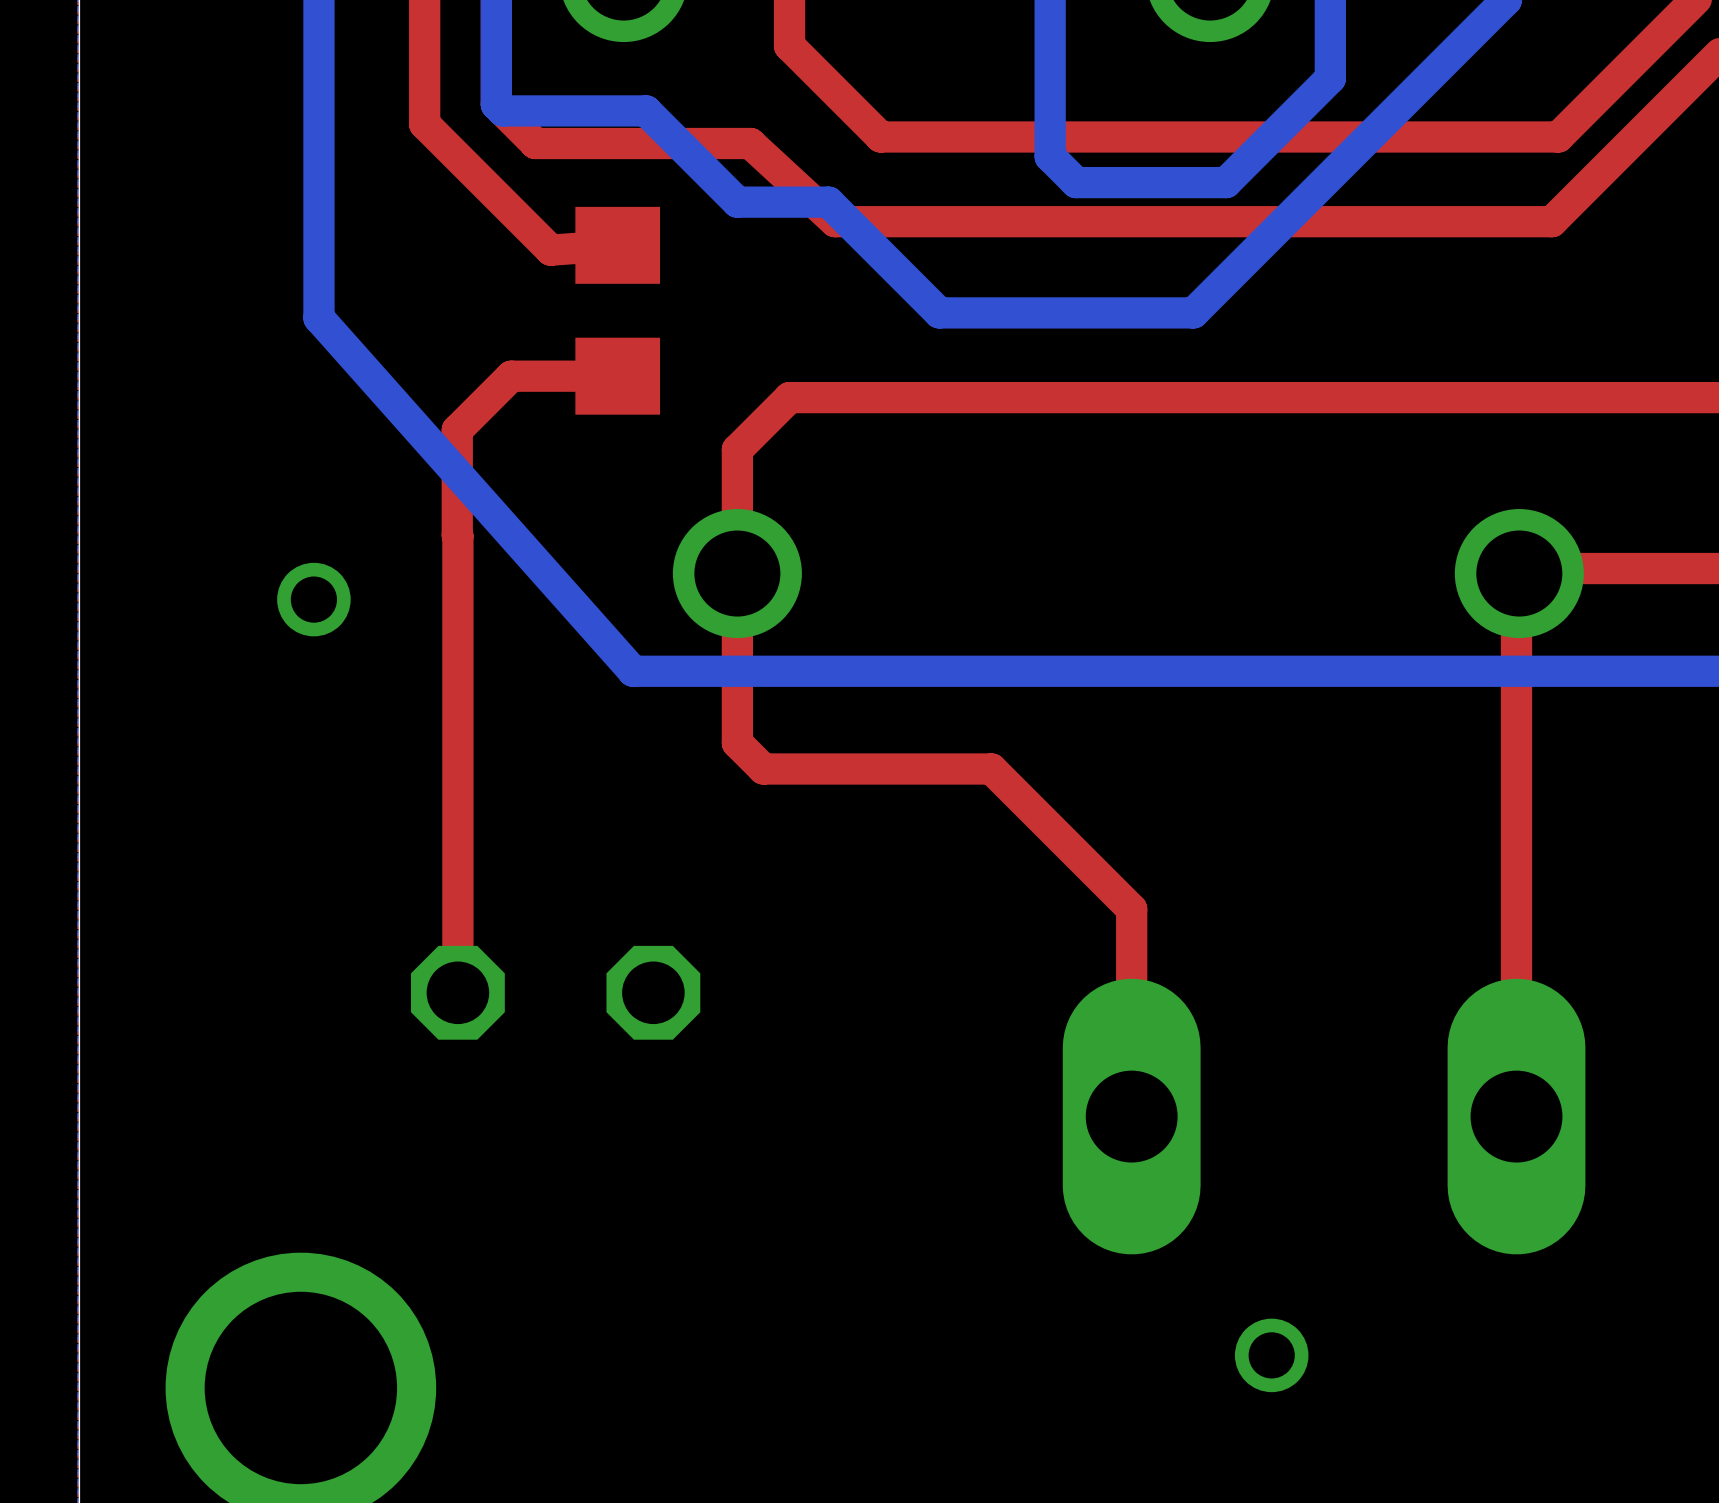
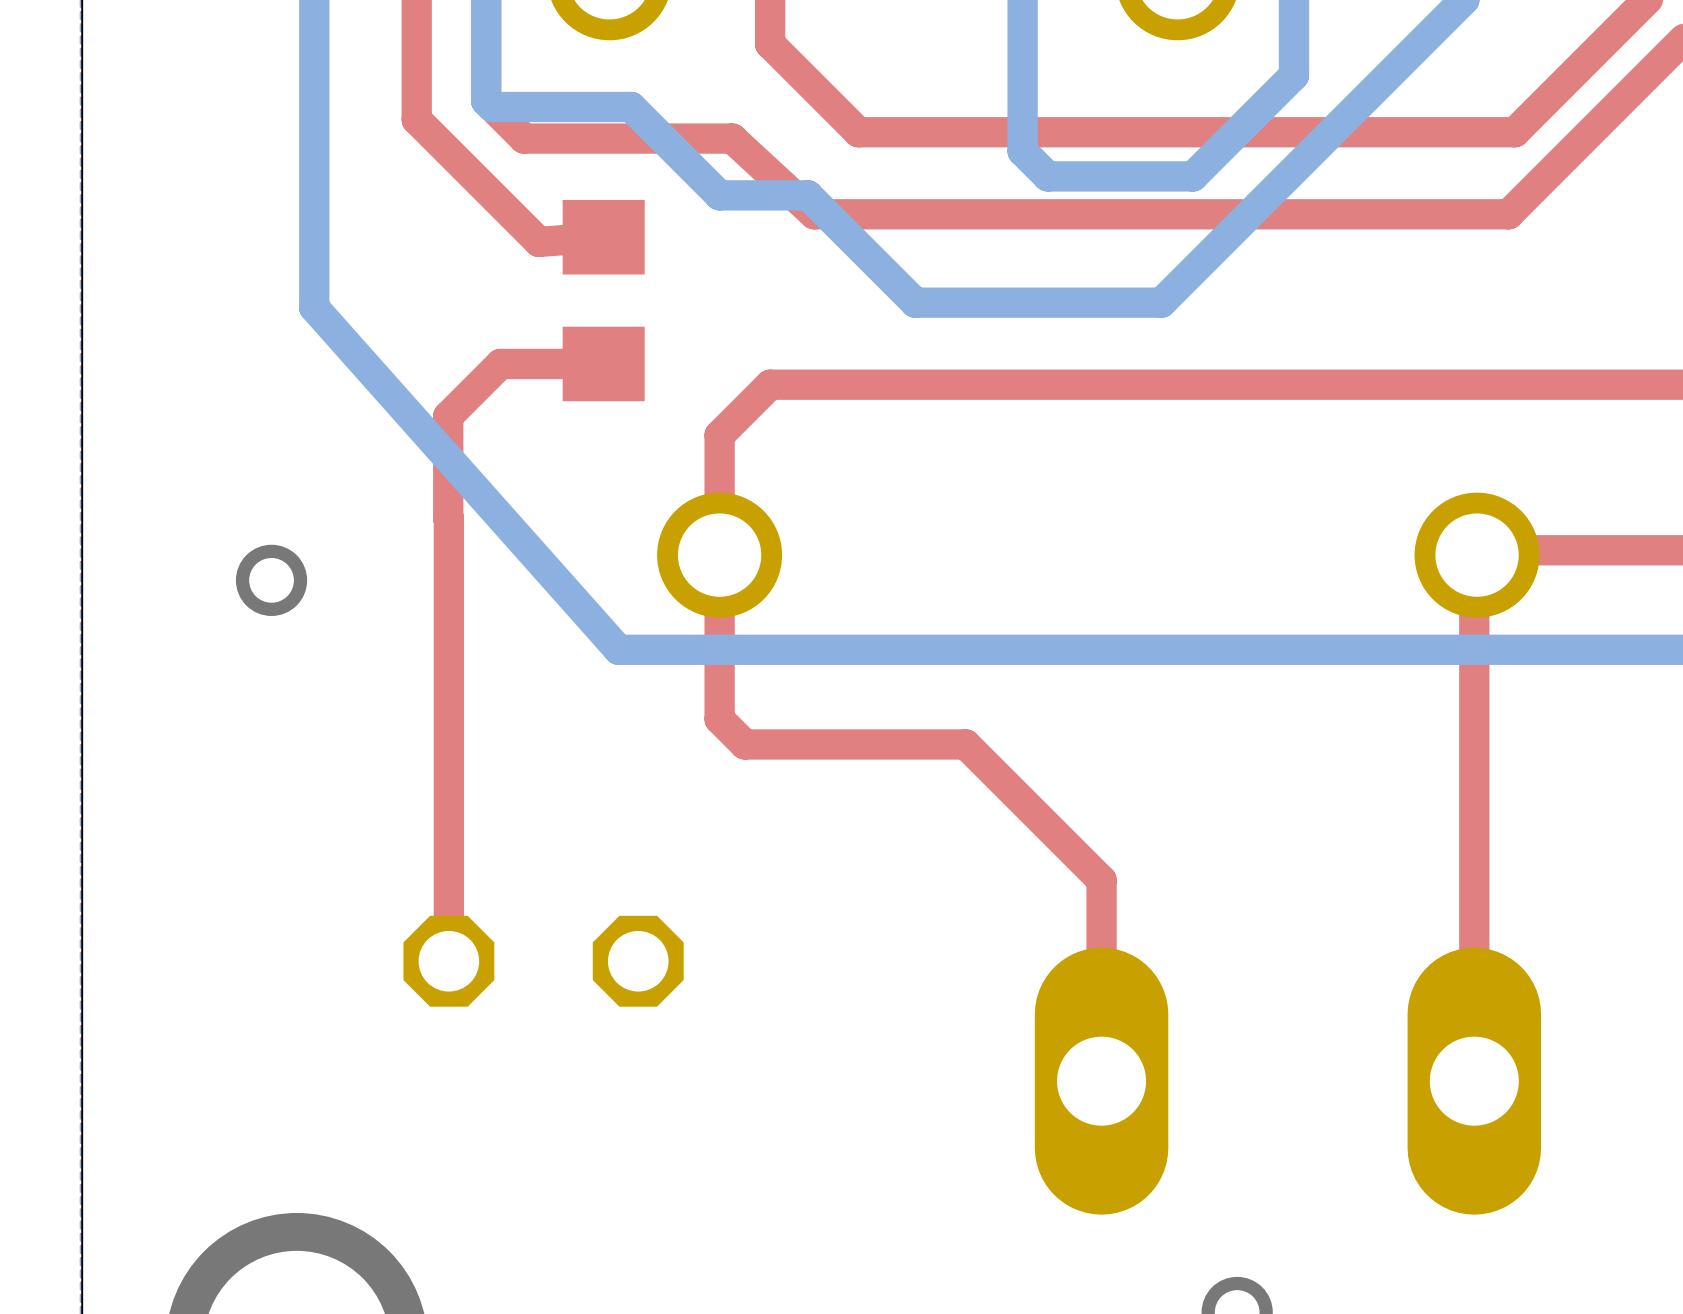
via position: (313, 599) -> (271, 580)

